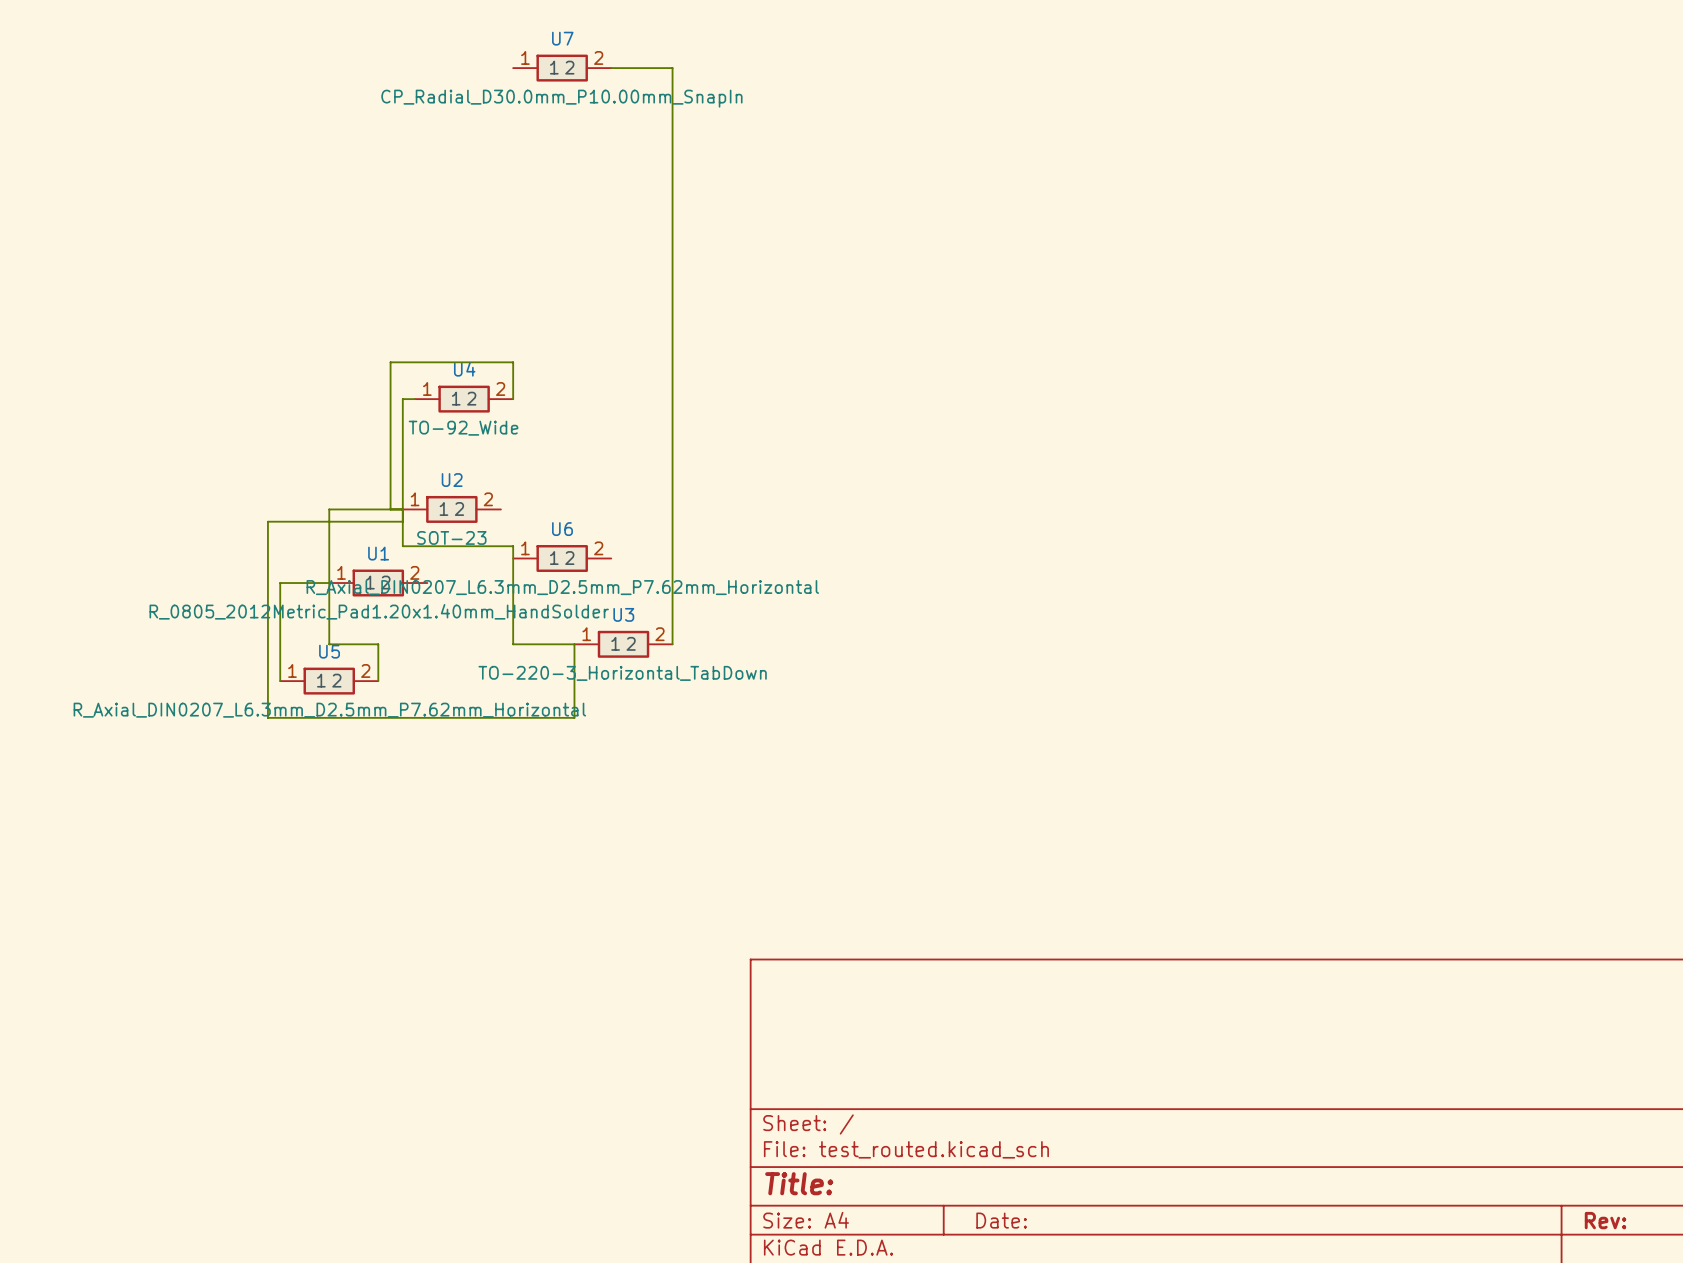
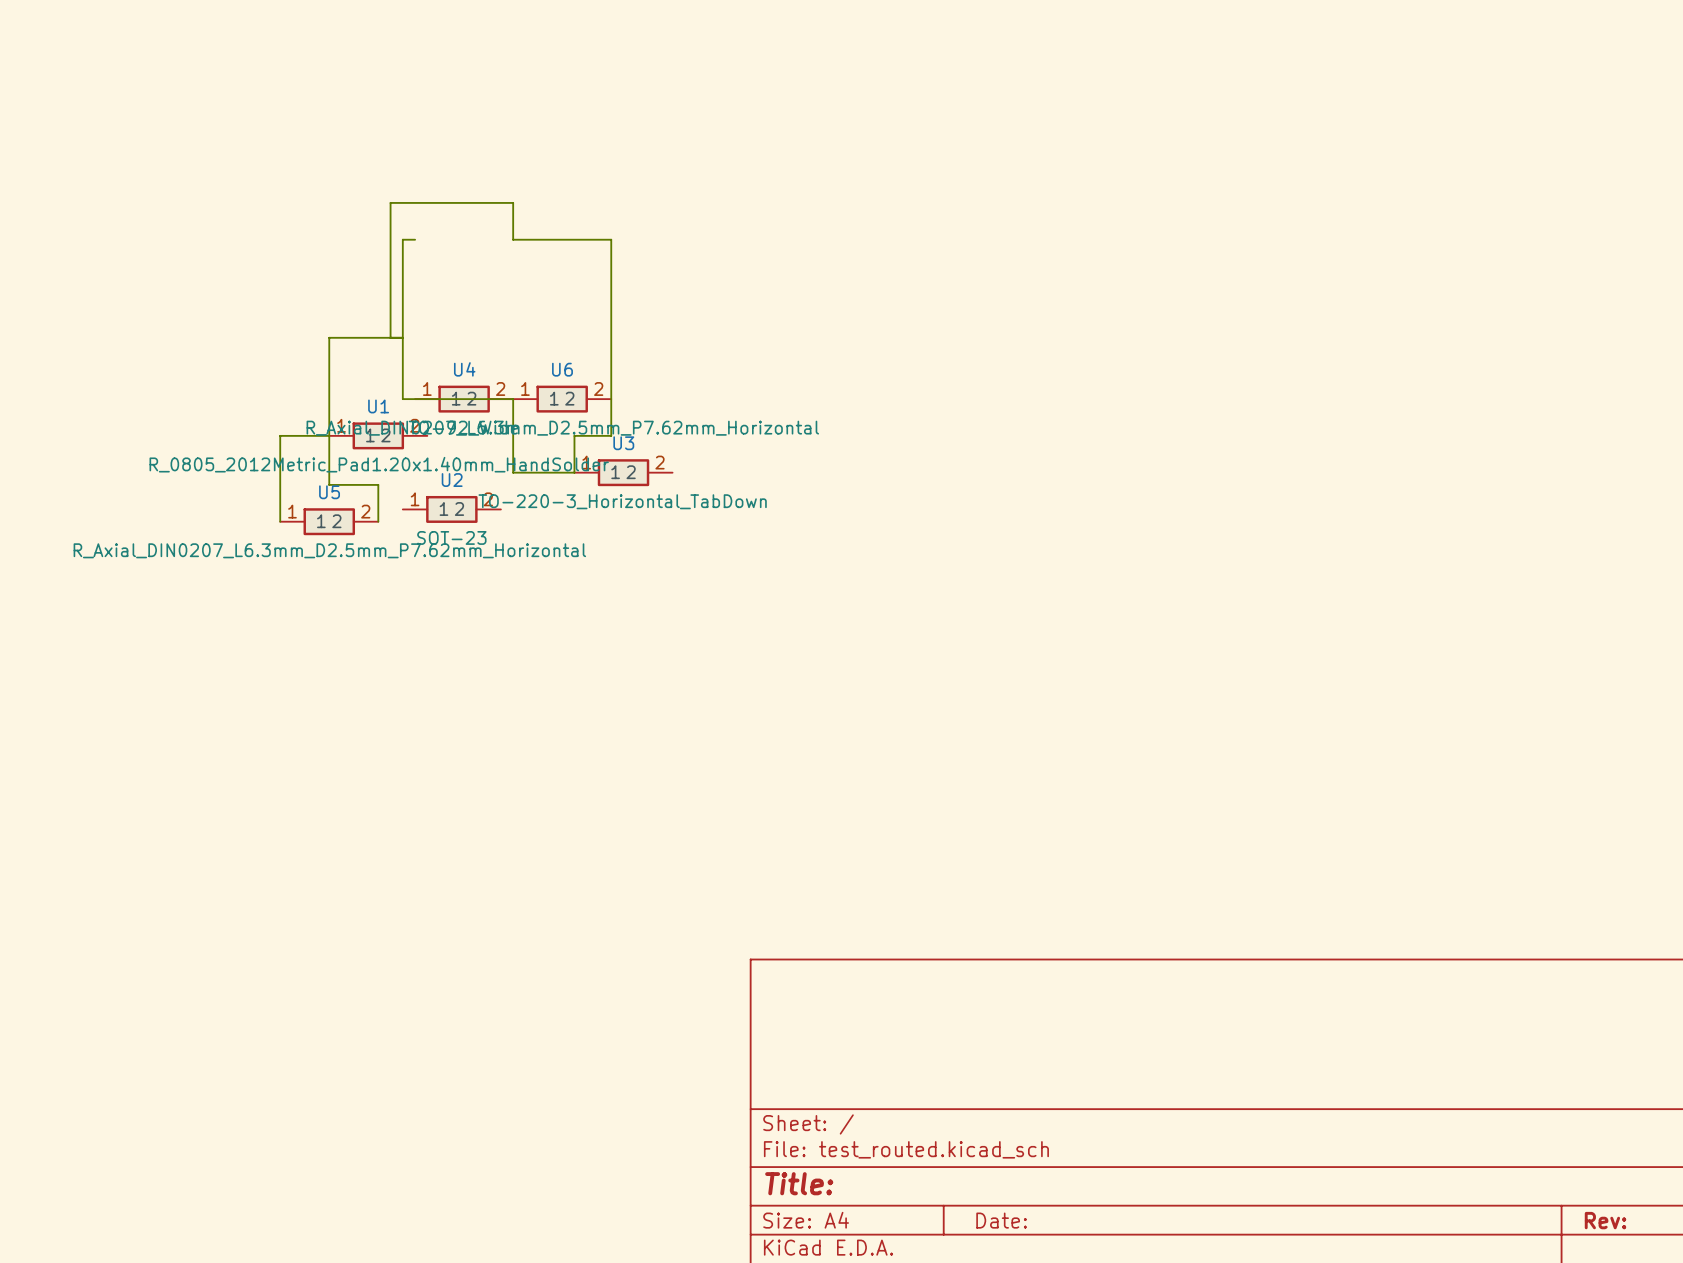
U7: CP_Radial_D30.0mm_P10.00mm_SnapIn (562, 68) -> none
wire: (611, 68) (672, 68) (672, 644) -> none
wire: none -> (390, 337) (390, 202) (513, 202) (513, 239) (611, 239) (611, 435) (574, 435) (574, 472) (513, 472) (513, 399) (415, 399)
wire: none -> (402, 337) (329, 337) (329, 484) (378, 484) (378, 521)
wire: (402, 399) (402, 546) (513, 546) (513, 644) (574, 644) (574, 717) (267, 717) (267, 521) (402, 521) -> (402, 399) (402, 239) (415, 239)
wire: (513, 399) (513, 362) (390, 362) (390, 509) -> none
wire: none -> (329, 435) (280, 435) (280, 521)
wire: (402, 509) (329, 509) (329, 644) (378, 644) (378, 681) -> none
U6 position: (562, 558) -> (562, 399)
wire: (329, 583) (280, 583) (280, 681) -> none
U1 position: (378, 583) -> (378, 435)
U3 position: (623, 644) -> (623, 472)
U5 position: (329, 681) -> (329, 521)

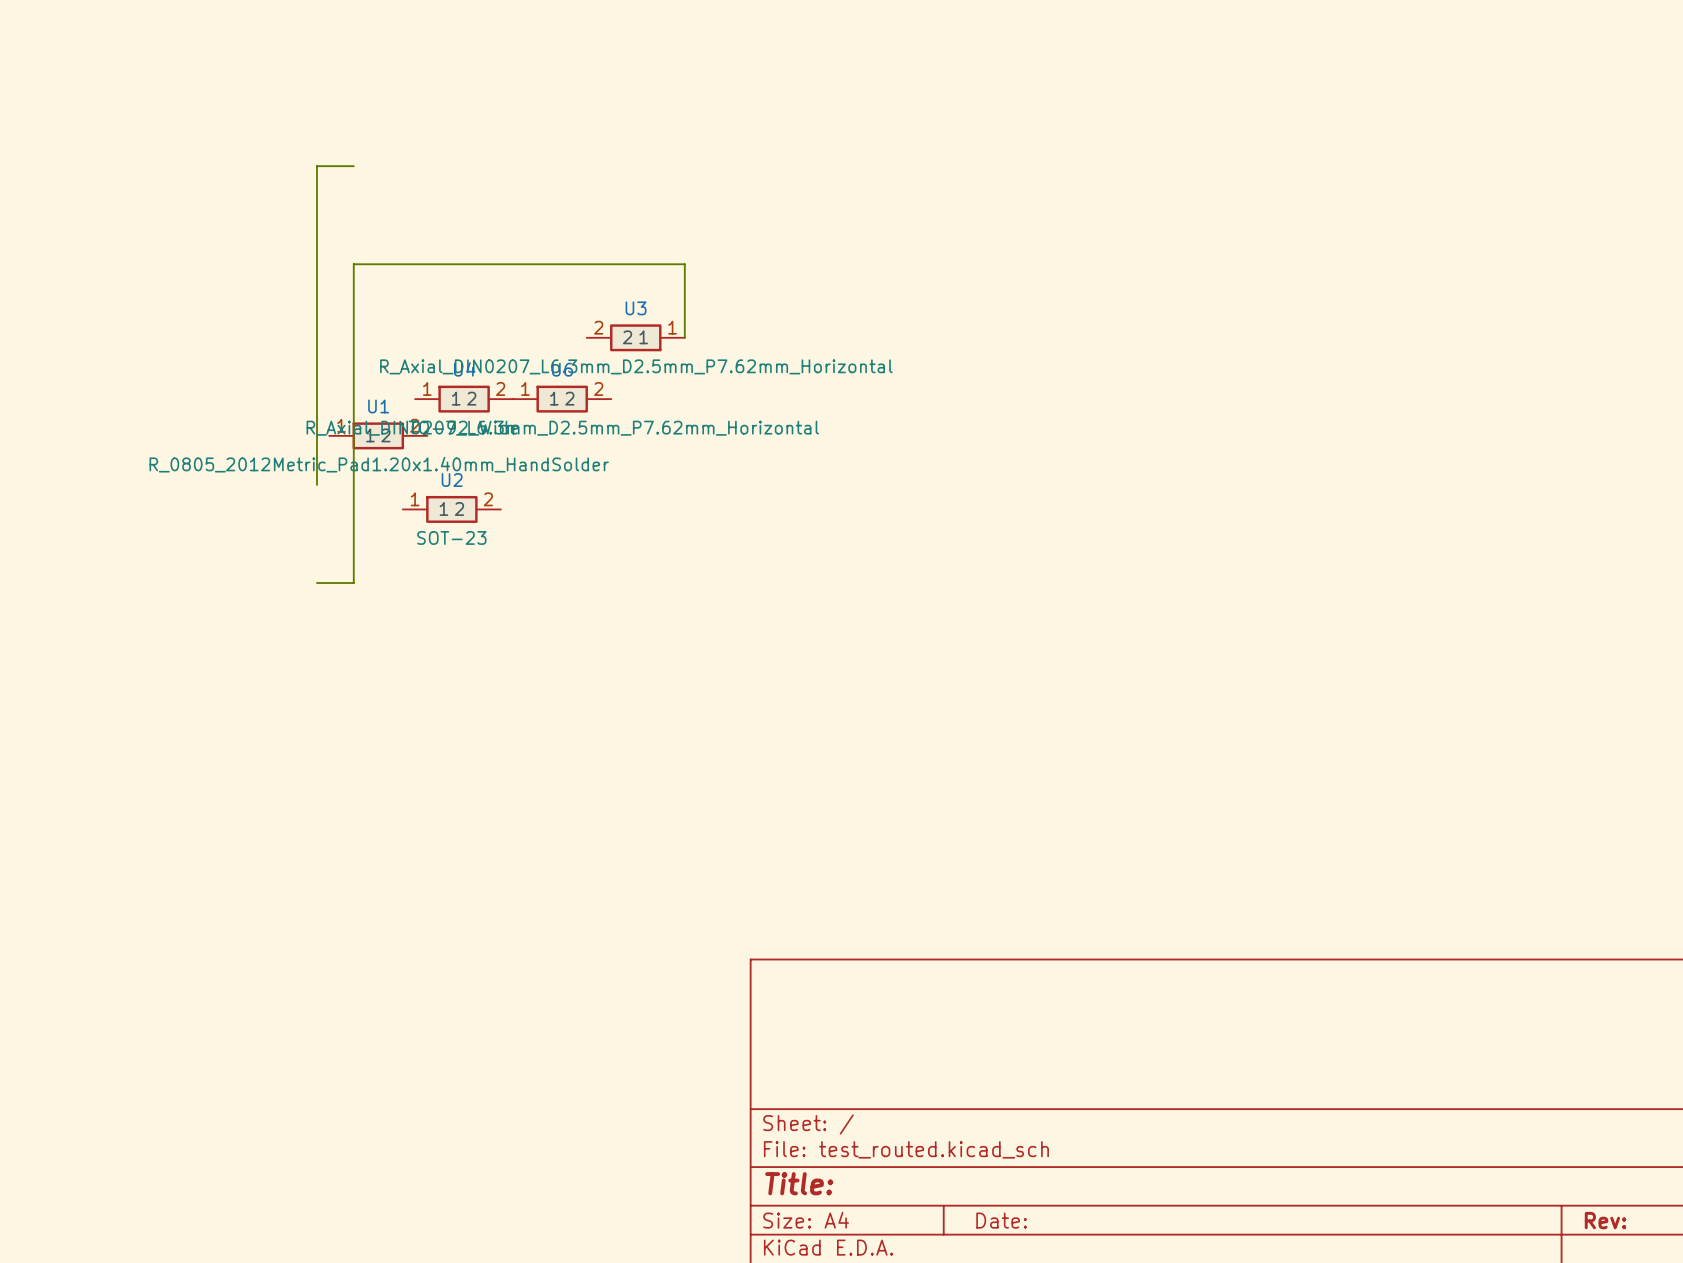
wire: none -> (353, 166) (317, 166) (317, 484)
wire: (415, 239) (402, 239) (402, 399) (513, 399) (513, 472) (574, 472) (574, 435) (611, 435) (611, 239) (513, 239) (513, 202) (390, 202) (390, 337) -> none
wire: (402, 337) (329, 337) (329, 484) (378, 484) (378, 521) -> none
wire: none -> (684, 337) (684, 264) (353, 264) (353, 583) (317, 583)
wire: (329, 435) (280, 435) (280, 521) -> none
U3 rotation: 0° (623, 472) -> 180° (635, 337)
U3 position: (623, 472) -> (635, 337)
U3 value: TO-220-3_Horizontal_TabDown (622, 501) -> R_Axial_DIN0207_L6.3mm_D2.5mm_P7.62mm_Horizontal (636, 366)
U5: R_Axial_DIN0207_L6.3mm_D2.5mm_P7.62mm_Horizontal (329, 521) -> none

